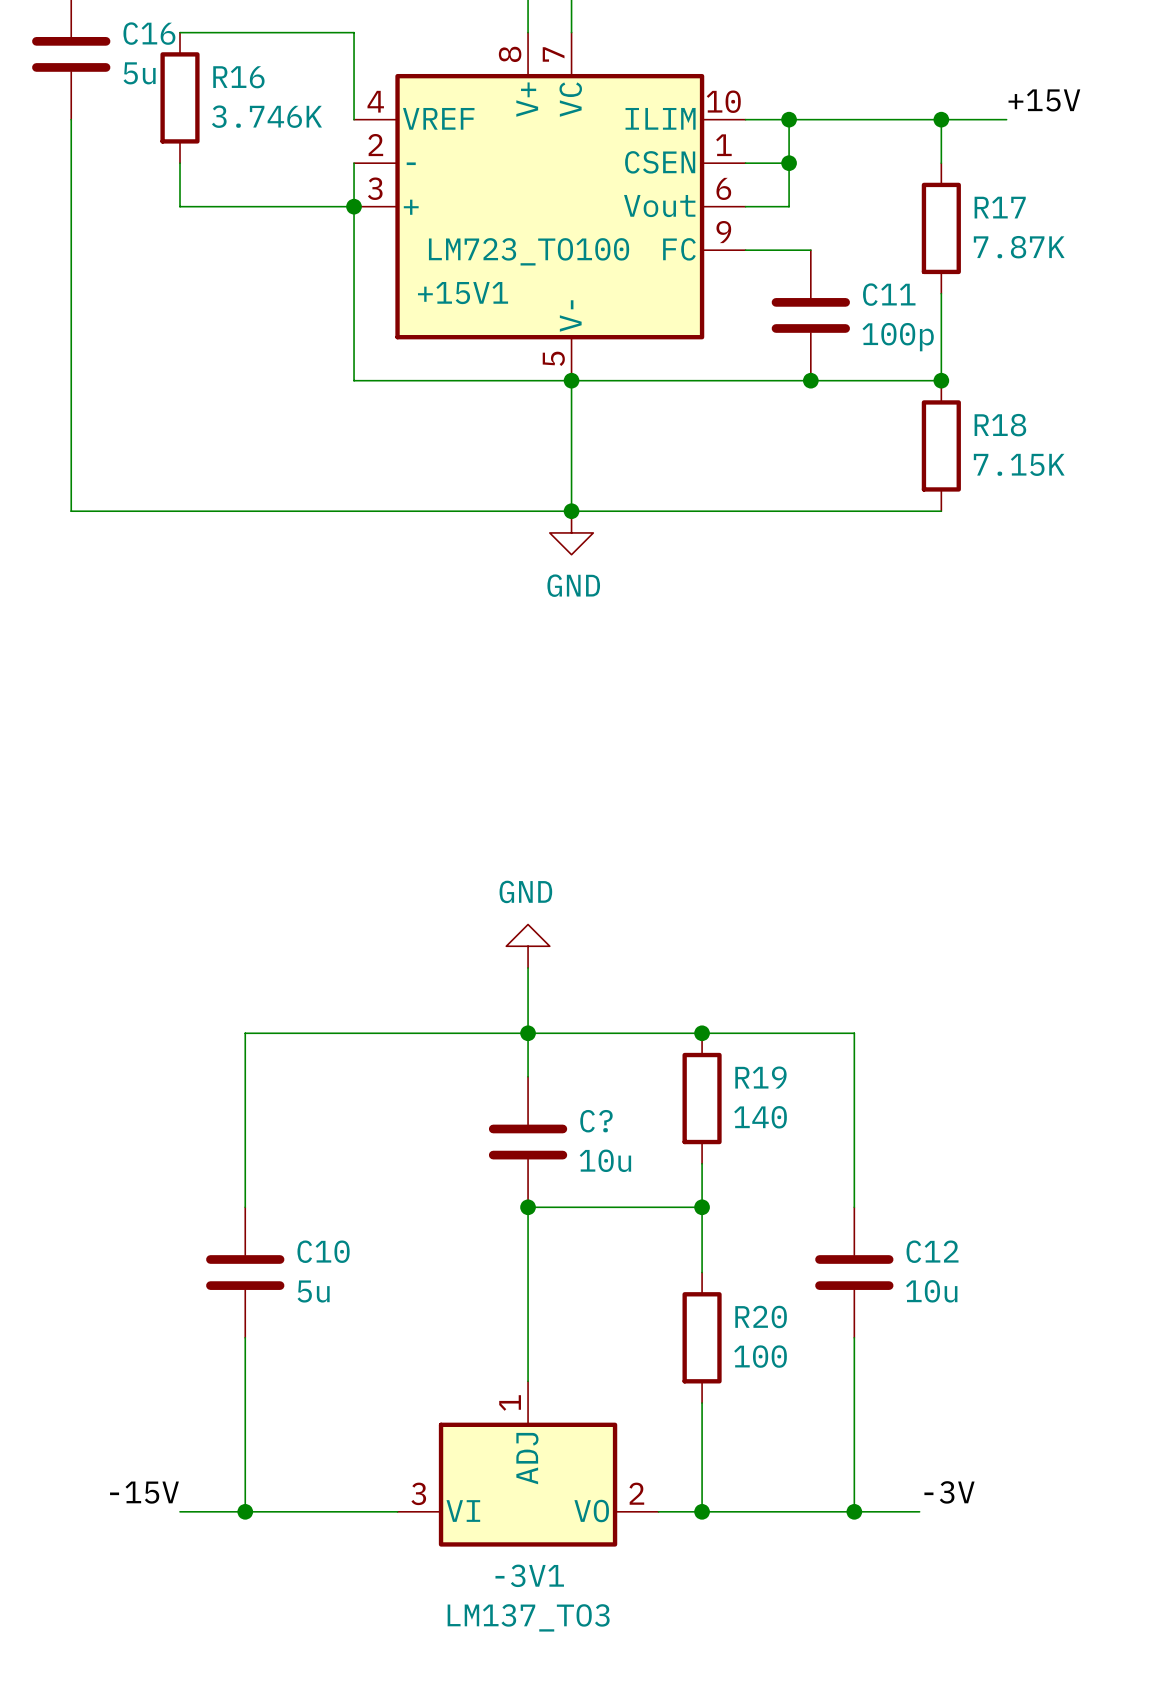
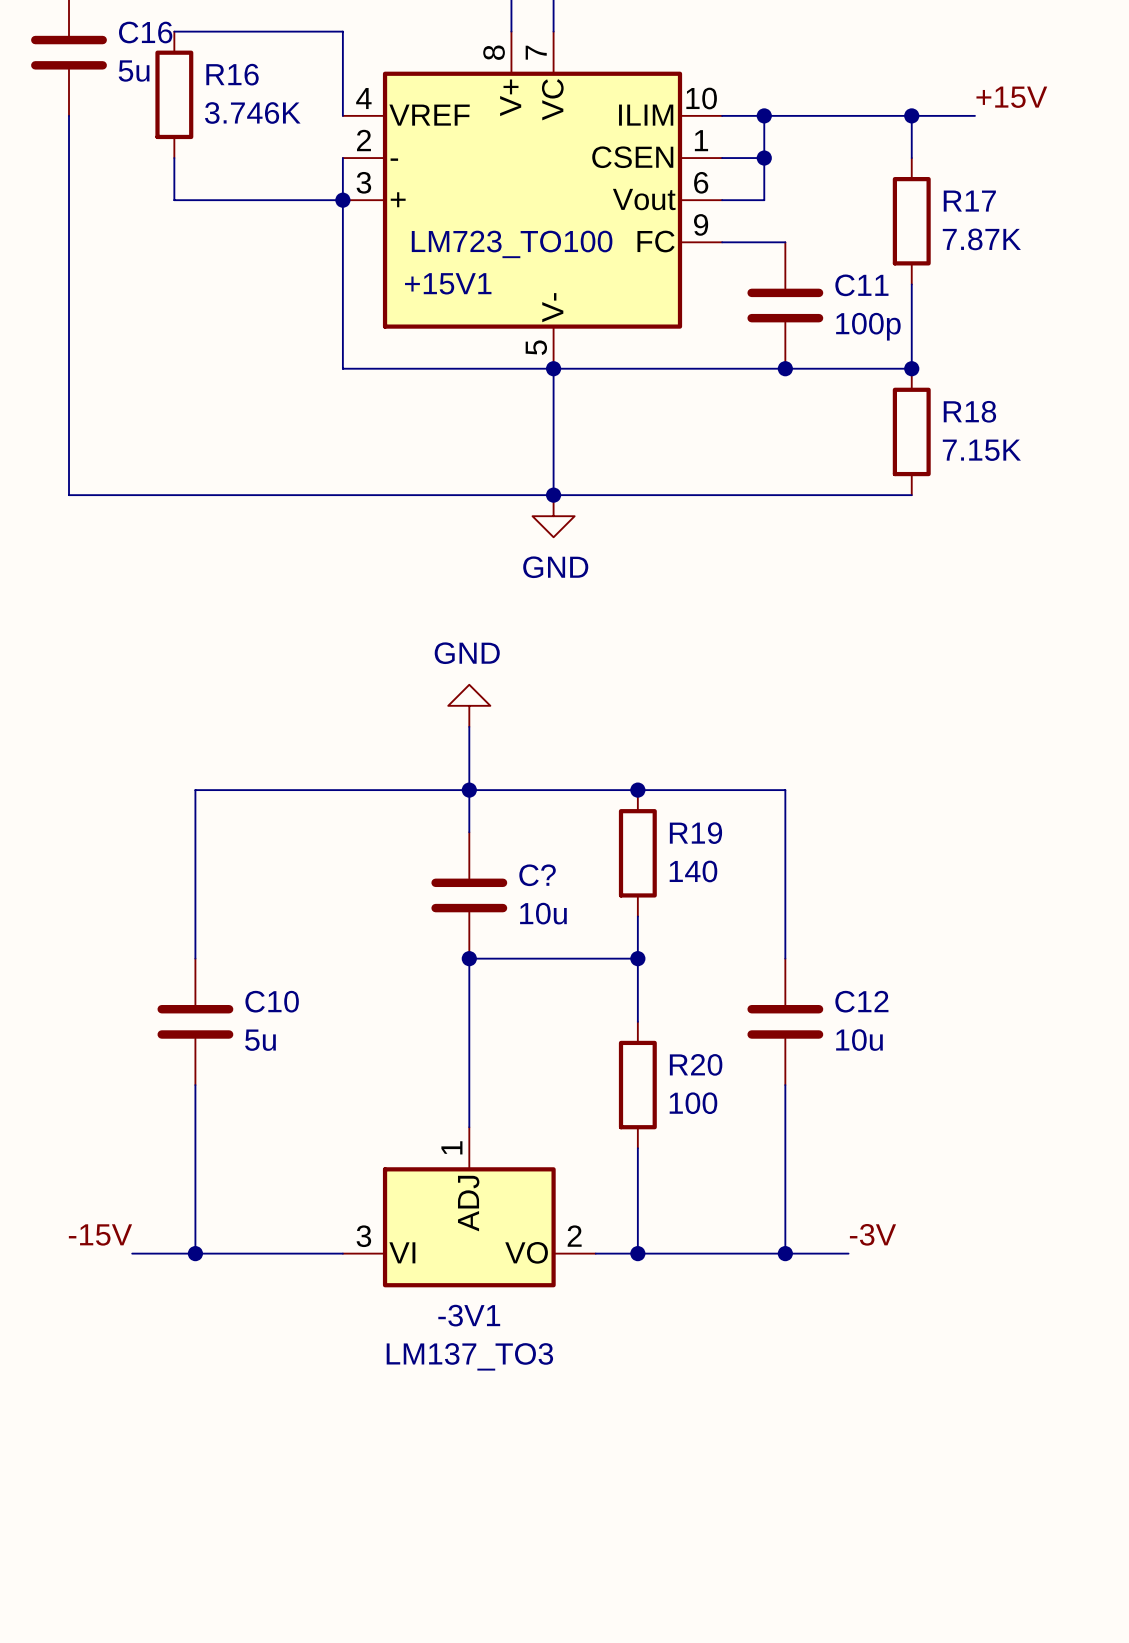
junction: none -> (469, 790)
junction: none -> (637, 790)
power symbol position: GND (528, 946) -> GND (469, 705)
wire: (528, 968) (528, 1076) -> (469, 726) (469, 832)
junction position: (528, 1033) -> (469, 958)
junction position: (702, 1033) -> (637, 958)
R19 position: (702, 1098) -> (637, 853)
C? position: (528, 1142) -> (469, 895)
wire: (702, 1163) (702, 1272) -> (637, 916) (637, 1021)
wire: (245, 1207) (245, 1033) (854, 1033) (854, 1207) -> (195, 958) (195, 790) (785, 790) (785, 958)
junction: (528, 1207) -> none
wire: (702, 1207) (528, 1207) (528, 1381) -> (637, 958) (469, 958) (469, 1127)
junction: (702, 1207) -> none
C10 position: (245, 1272) -> (195, 1021)
C12 position: (854, 1272) -> (785, 1021)
junction: none -> (195, 1253)
junction: none -> (637, 1253)
junction: none -> (785, 1253)
wire: (245, 1337) (245, 1511) -> (195, 1085) (195, 1253)
R20 position: (702, 1337) -> (637, 1085)
wire: (854, 1337) (854, 1511) -> (785, 1085) (785, 1253)
wire: (702, 1403) (702, 1511) -> (637, 1148) (637, 1253)
-3V1 position: (528, 1463) -> (469, 1207)
label position: -15V (144, 1492) -> -15V (100, 1234)
label position: -3V (949, 1492) -> -3V (872, 1234)
wire: (180, 1511) (397, 1511) -> (132, 1253) (342, 1253)
junction: (245, 1511) -> none
wire: (658, 1511) (919, 1511) -> (595, 1253) (848, 1253)
junction: (702, 1511) -> none
junction: (854, 1511) -> none

